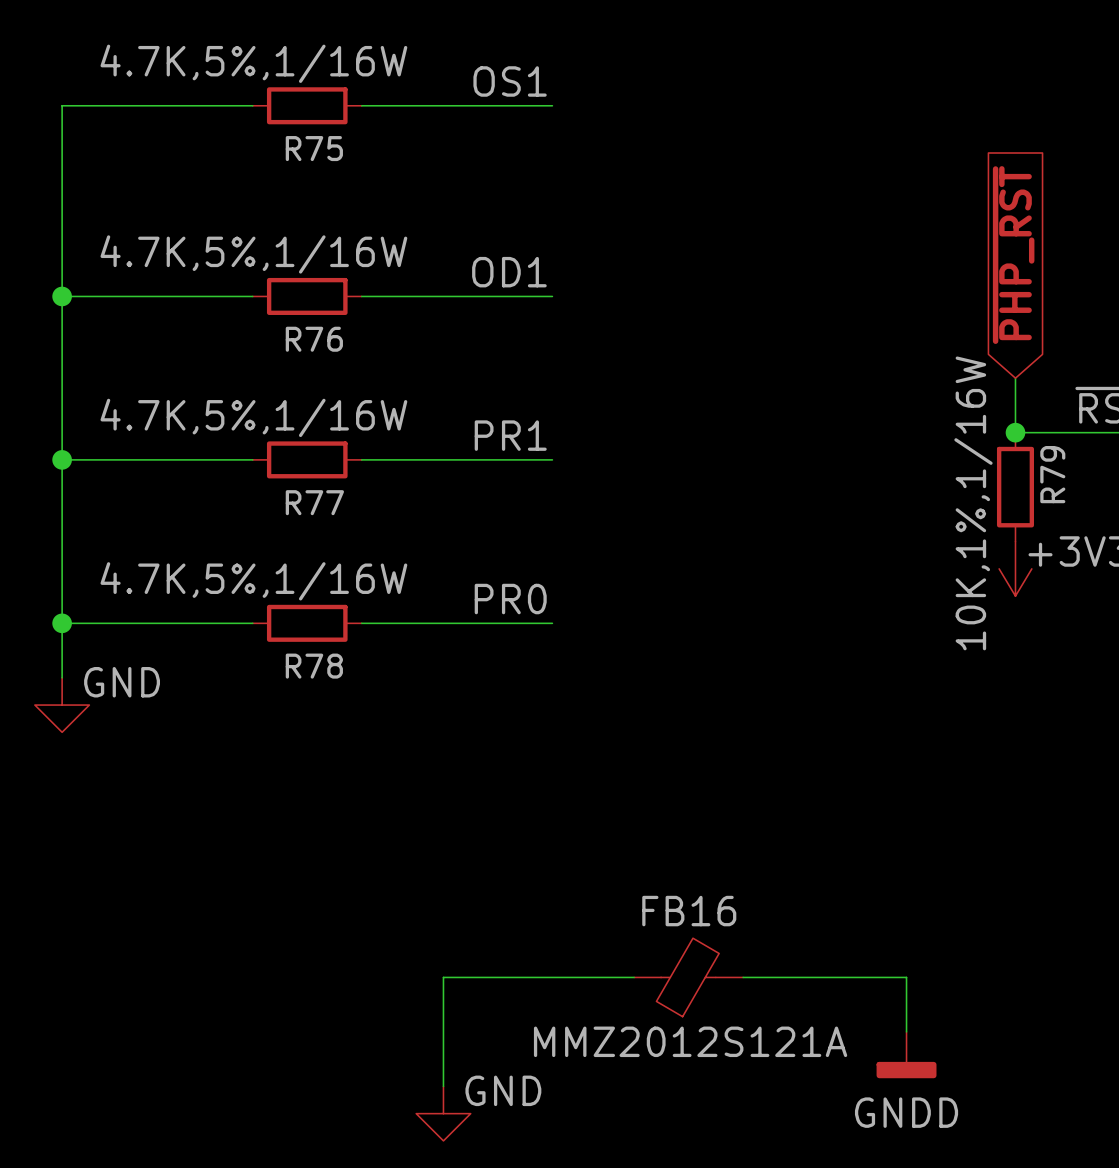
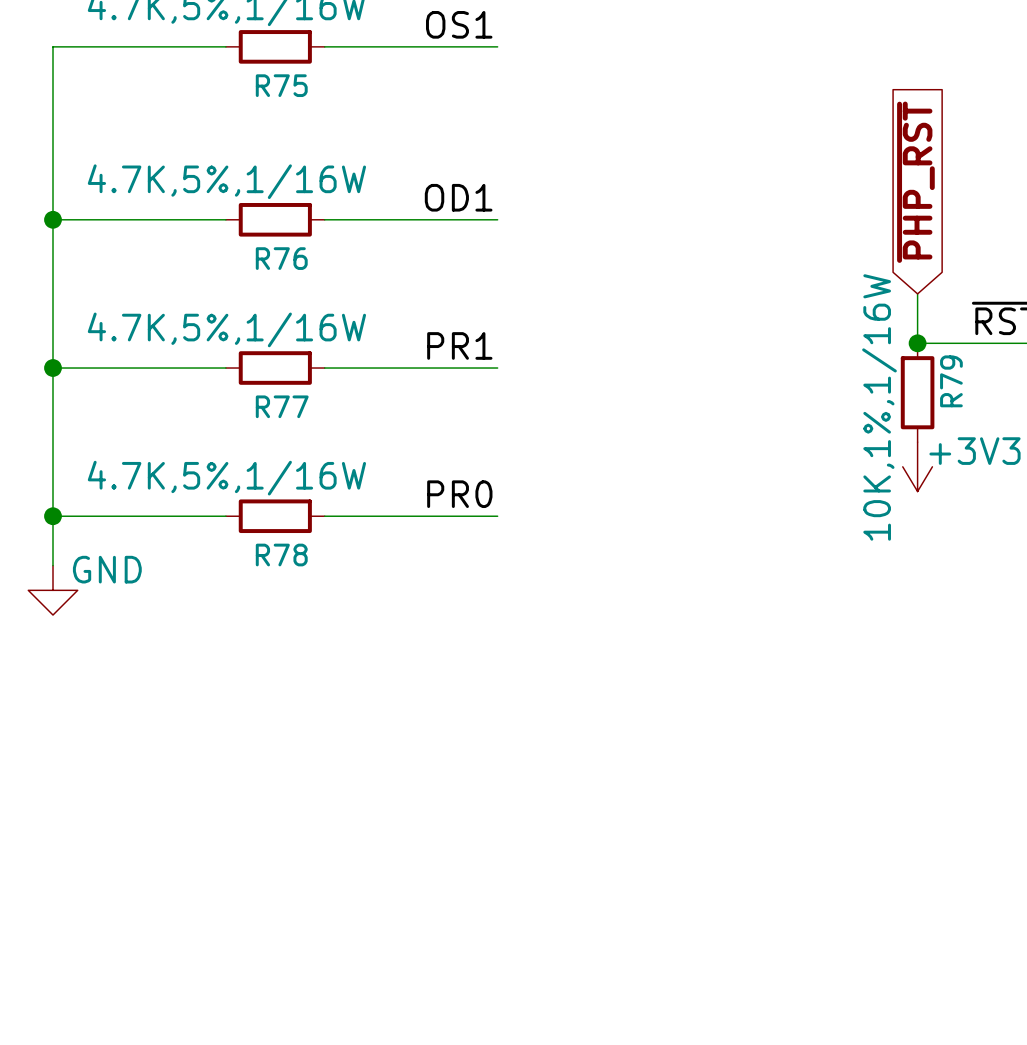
wire: (634, 977) (443, 977) (443, 1086) -> none
FB16: MMZ2012S121A (688, 977) -> none
wire: (743, 977) (906, 977) (906, 1031) -> none
power symbol: GNDD (906, 1055) -> none
power symbol: GND (443, 1113) -> none

